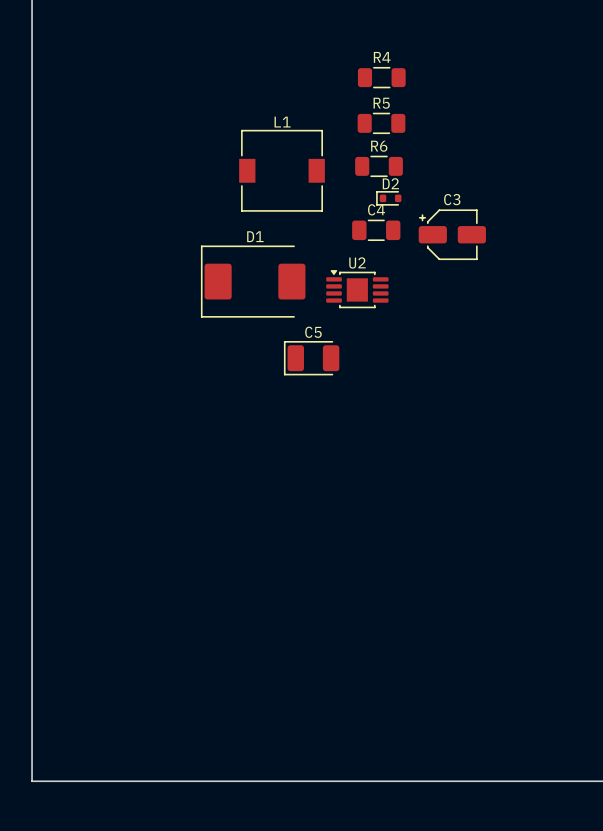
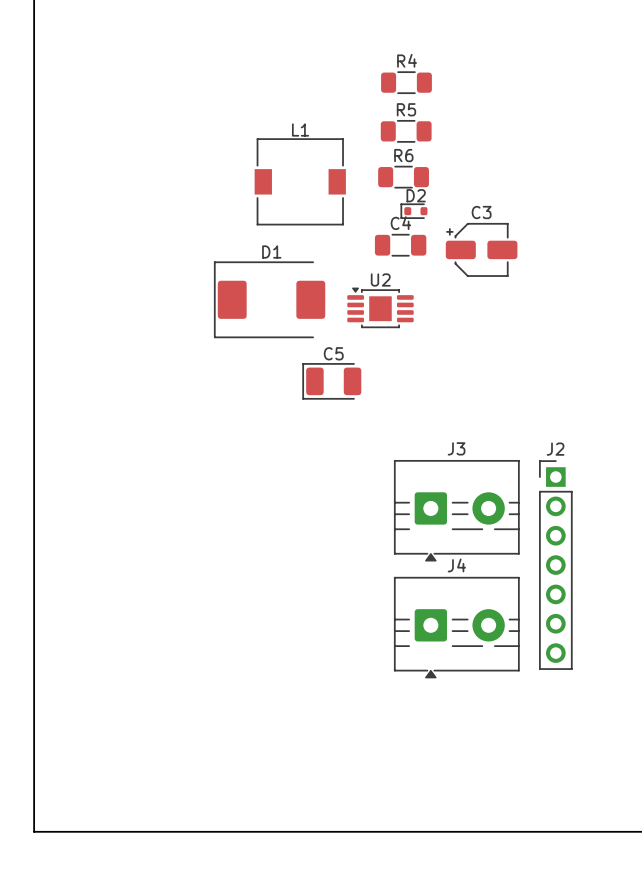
J3: none -> (456, 510)
J2: none -> (555, 565)
J4: none -> (456, 627)

